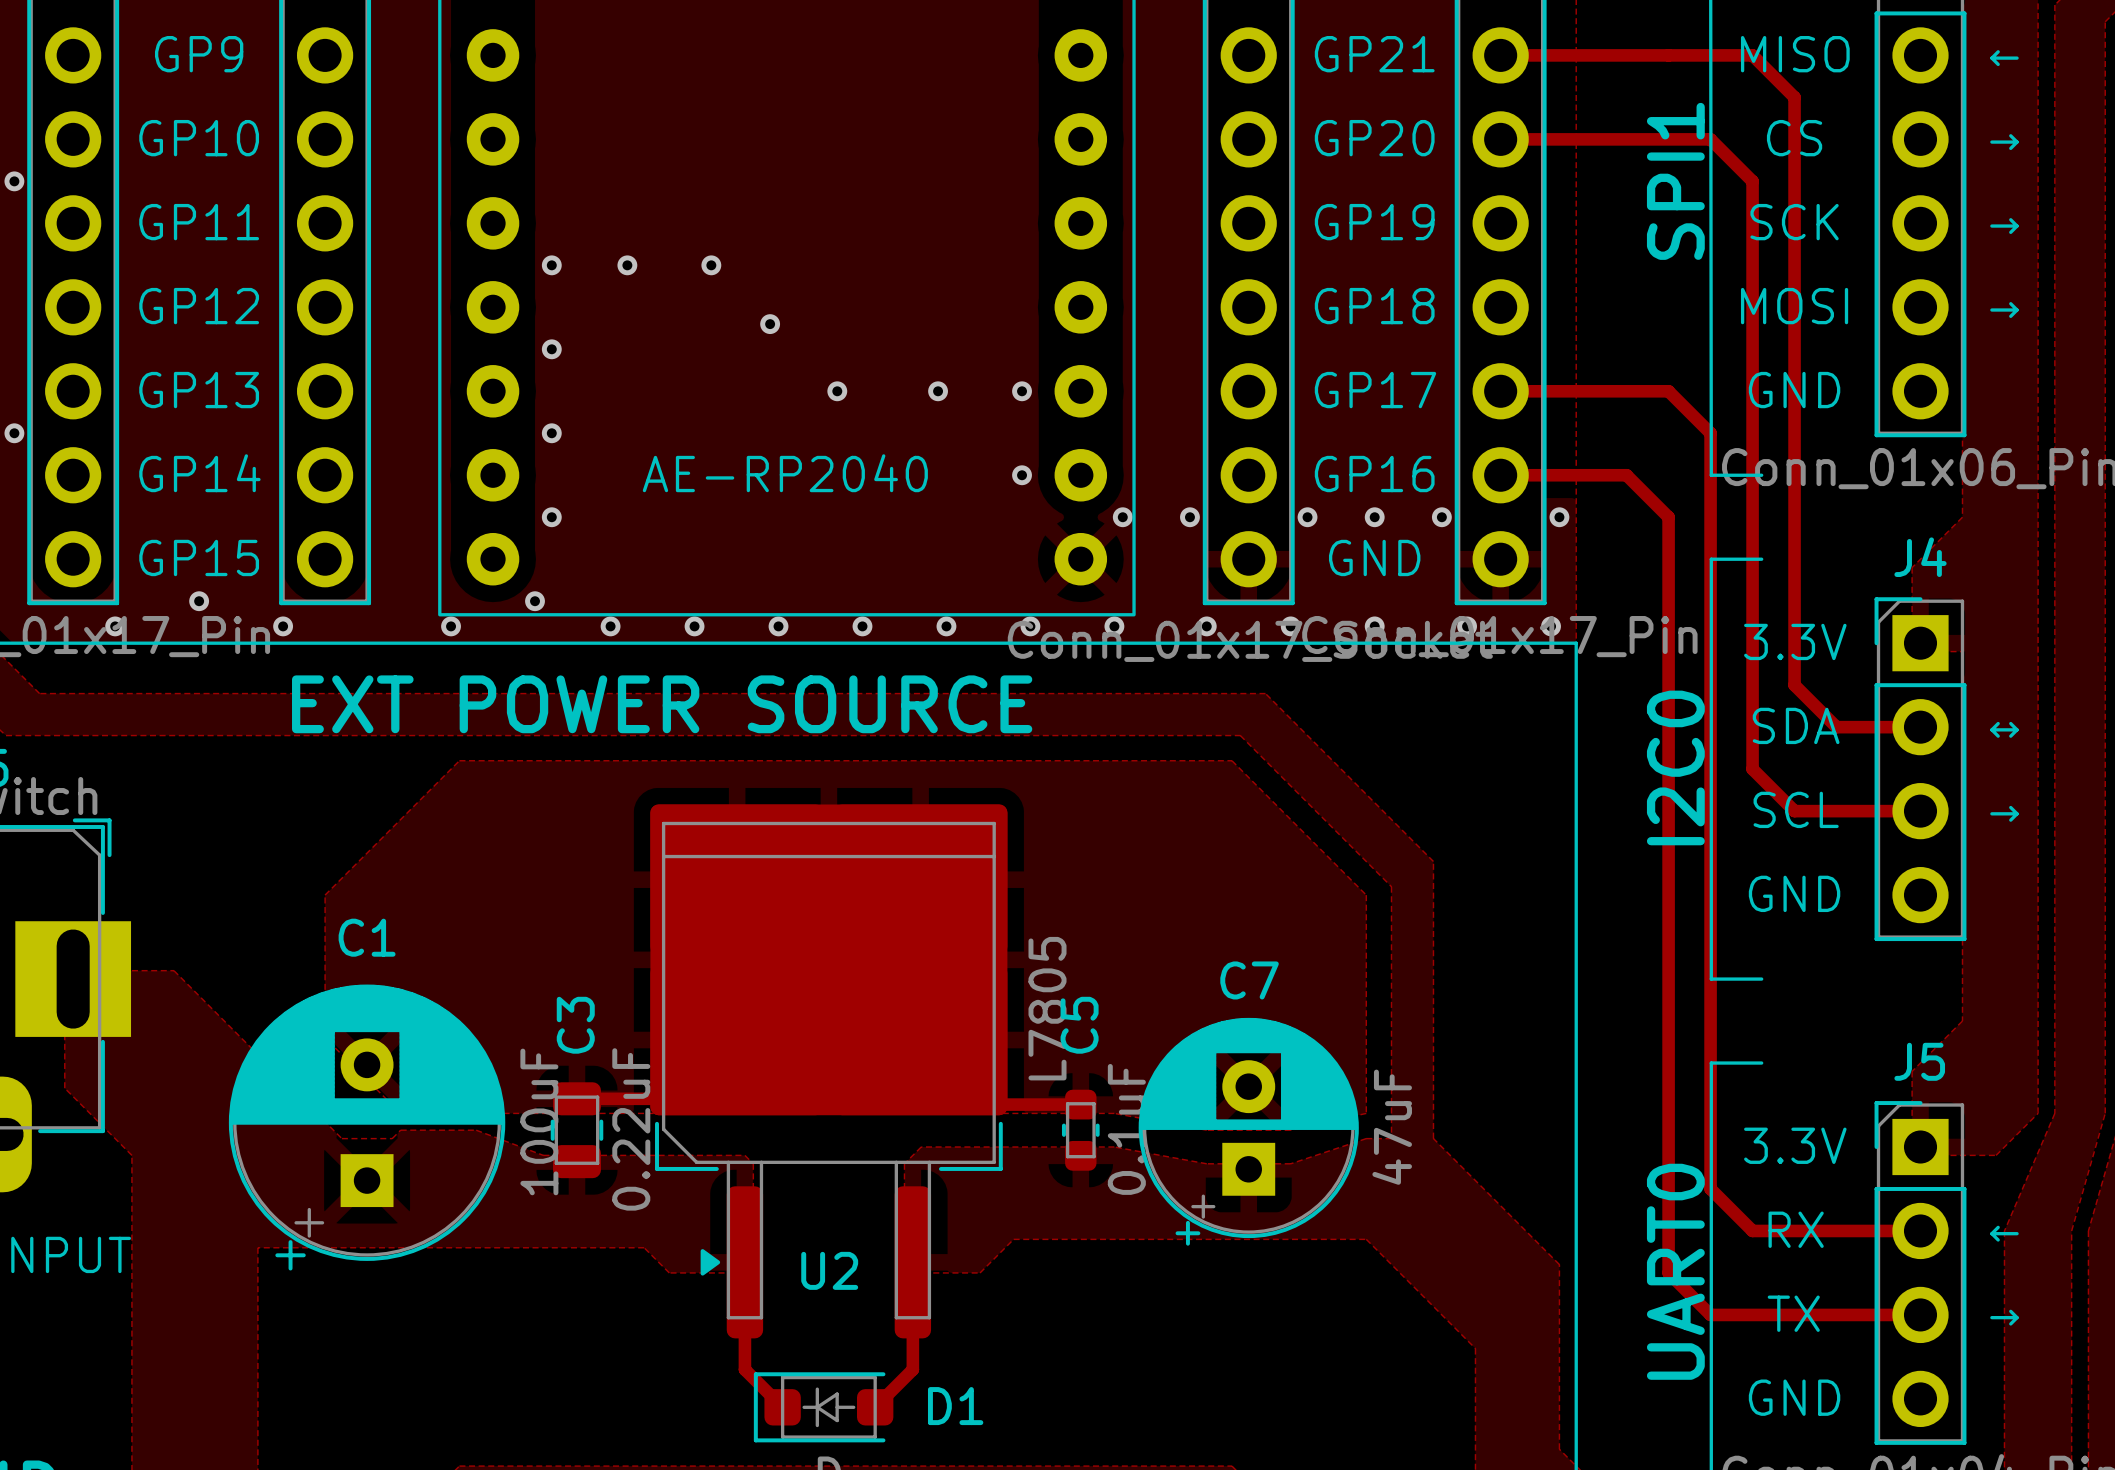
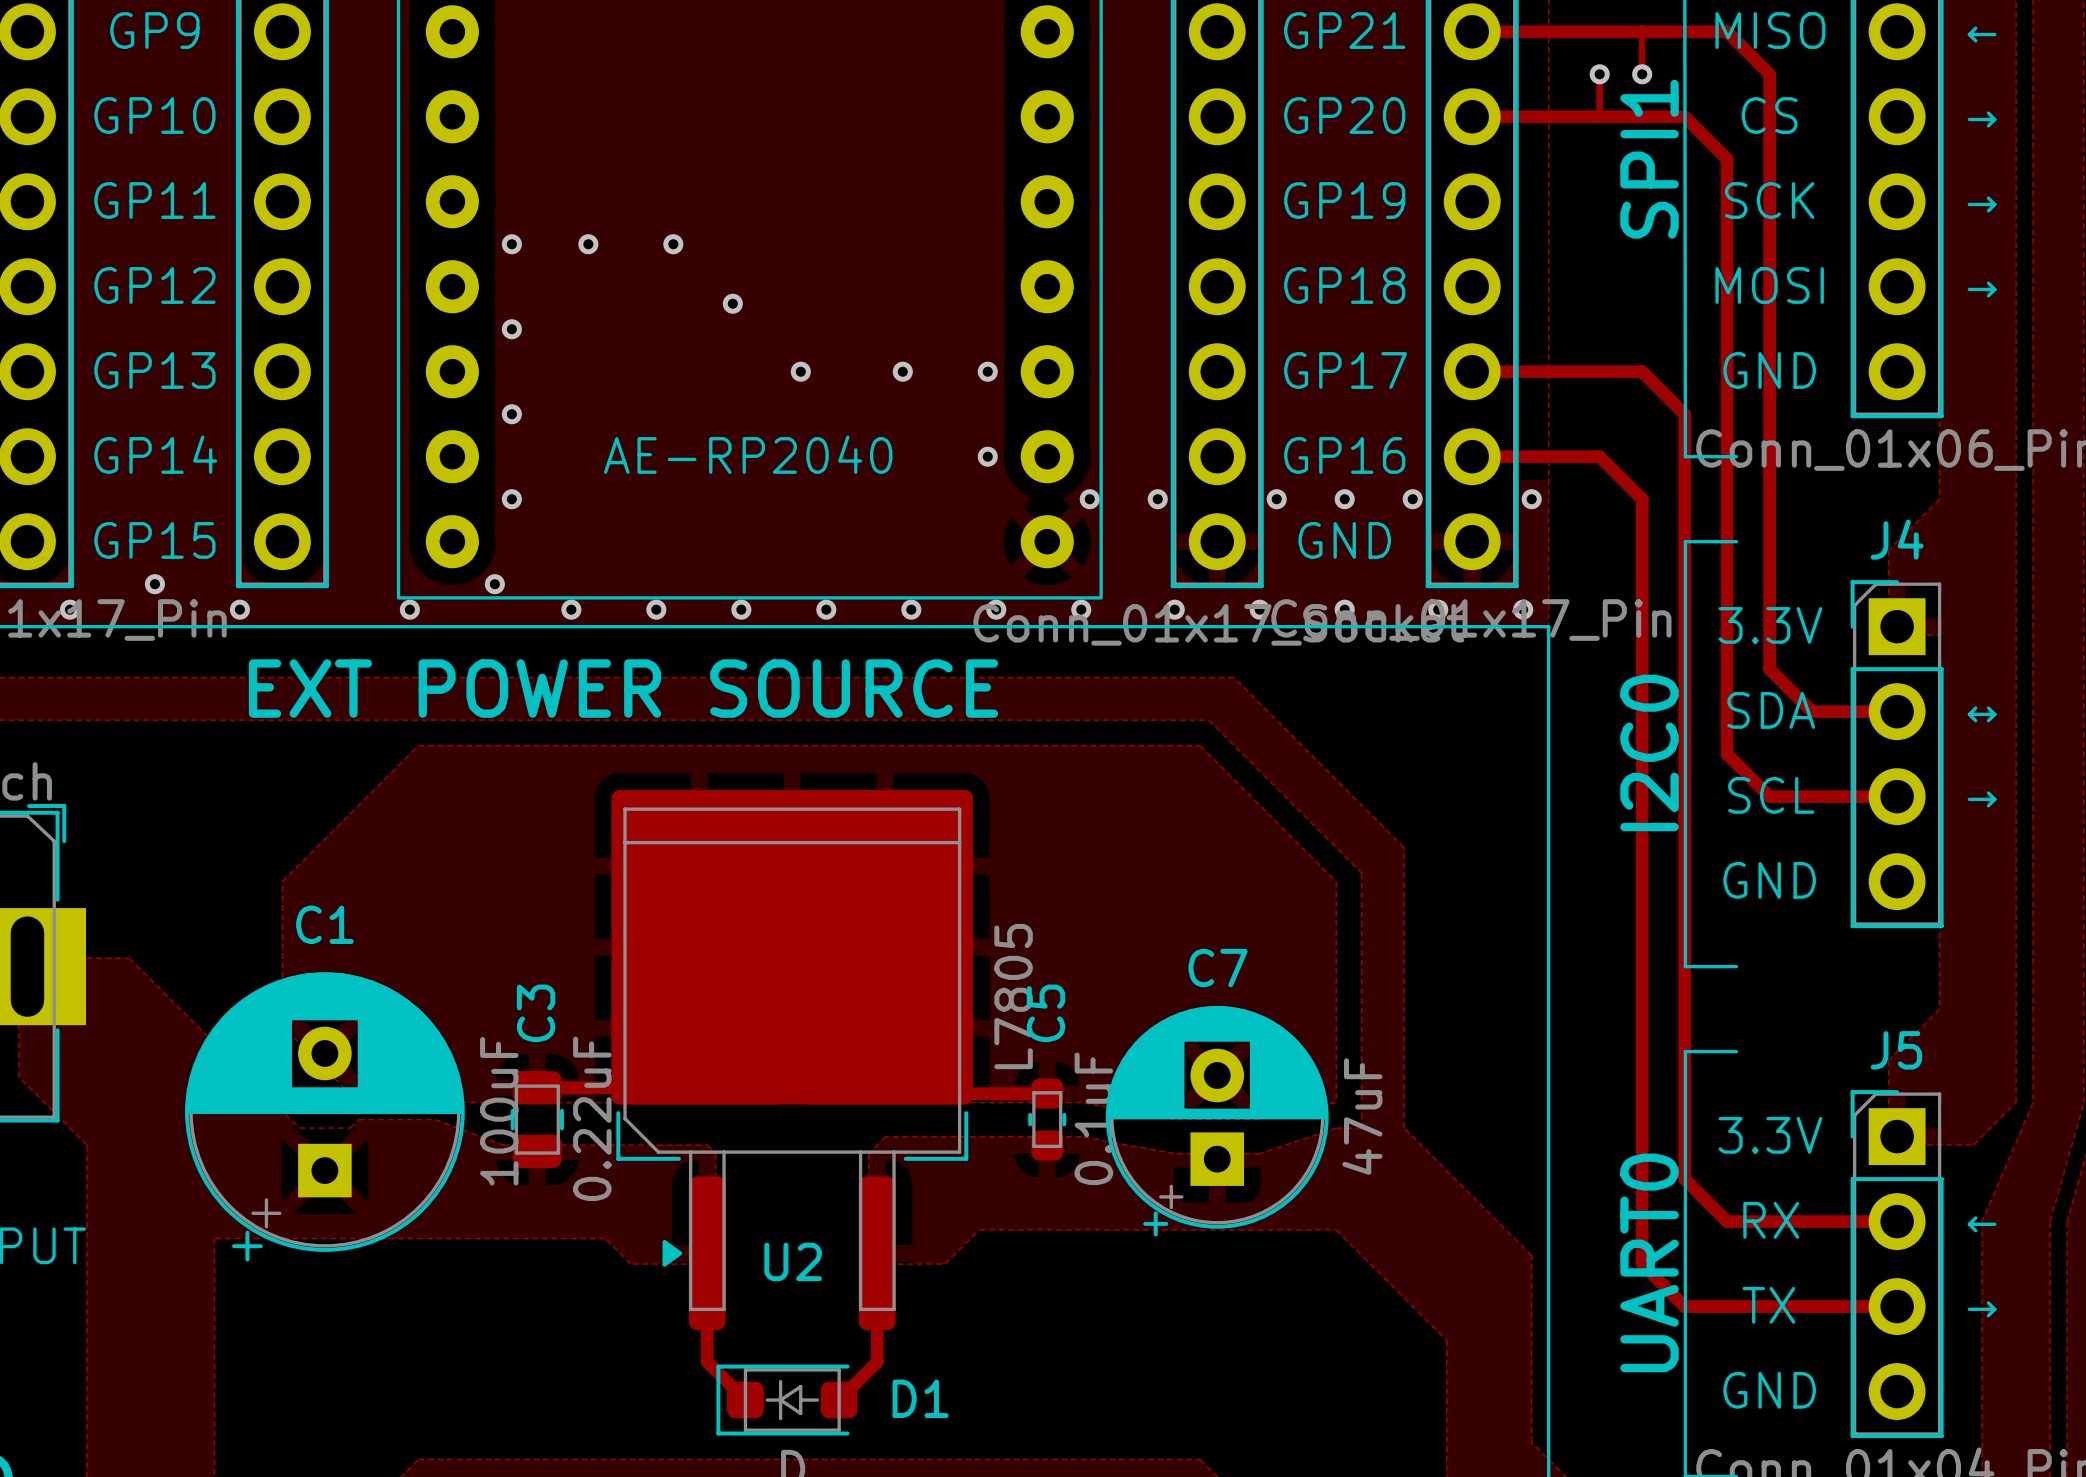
track: none -> (1642, 31) (1642, 74)
track: none -> (1599, 74) (1599, 116)
via: none -> (1599, 74)
via: none -> (1642, 74)

